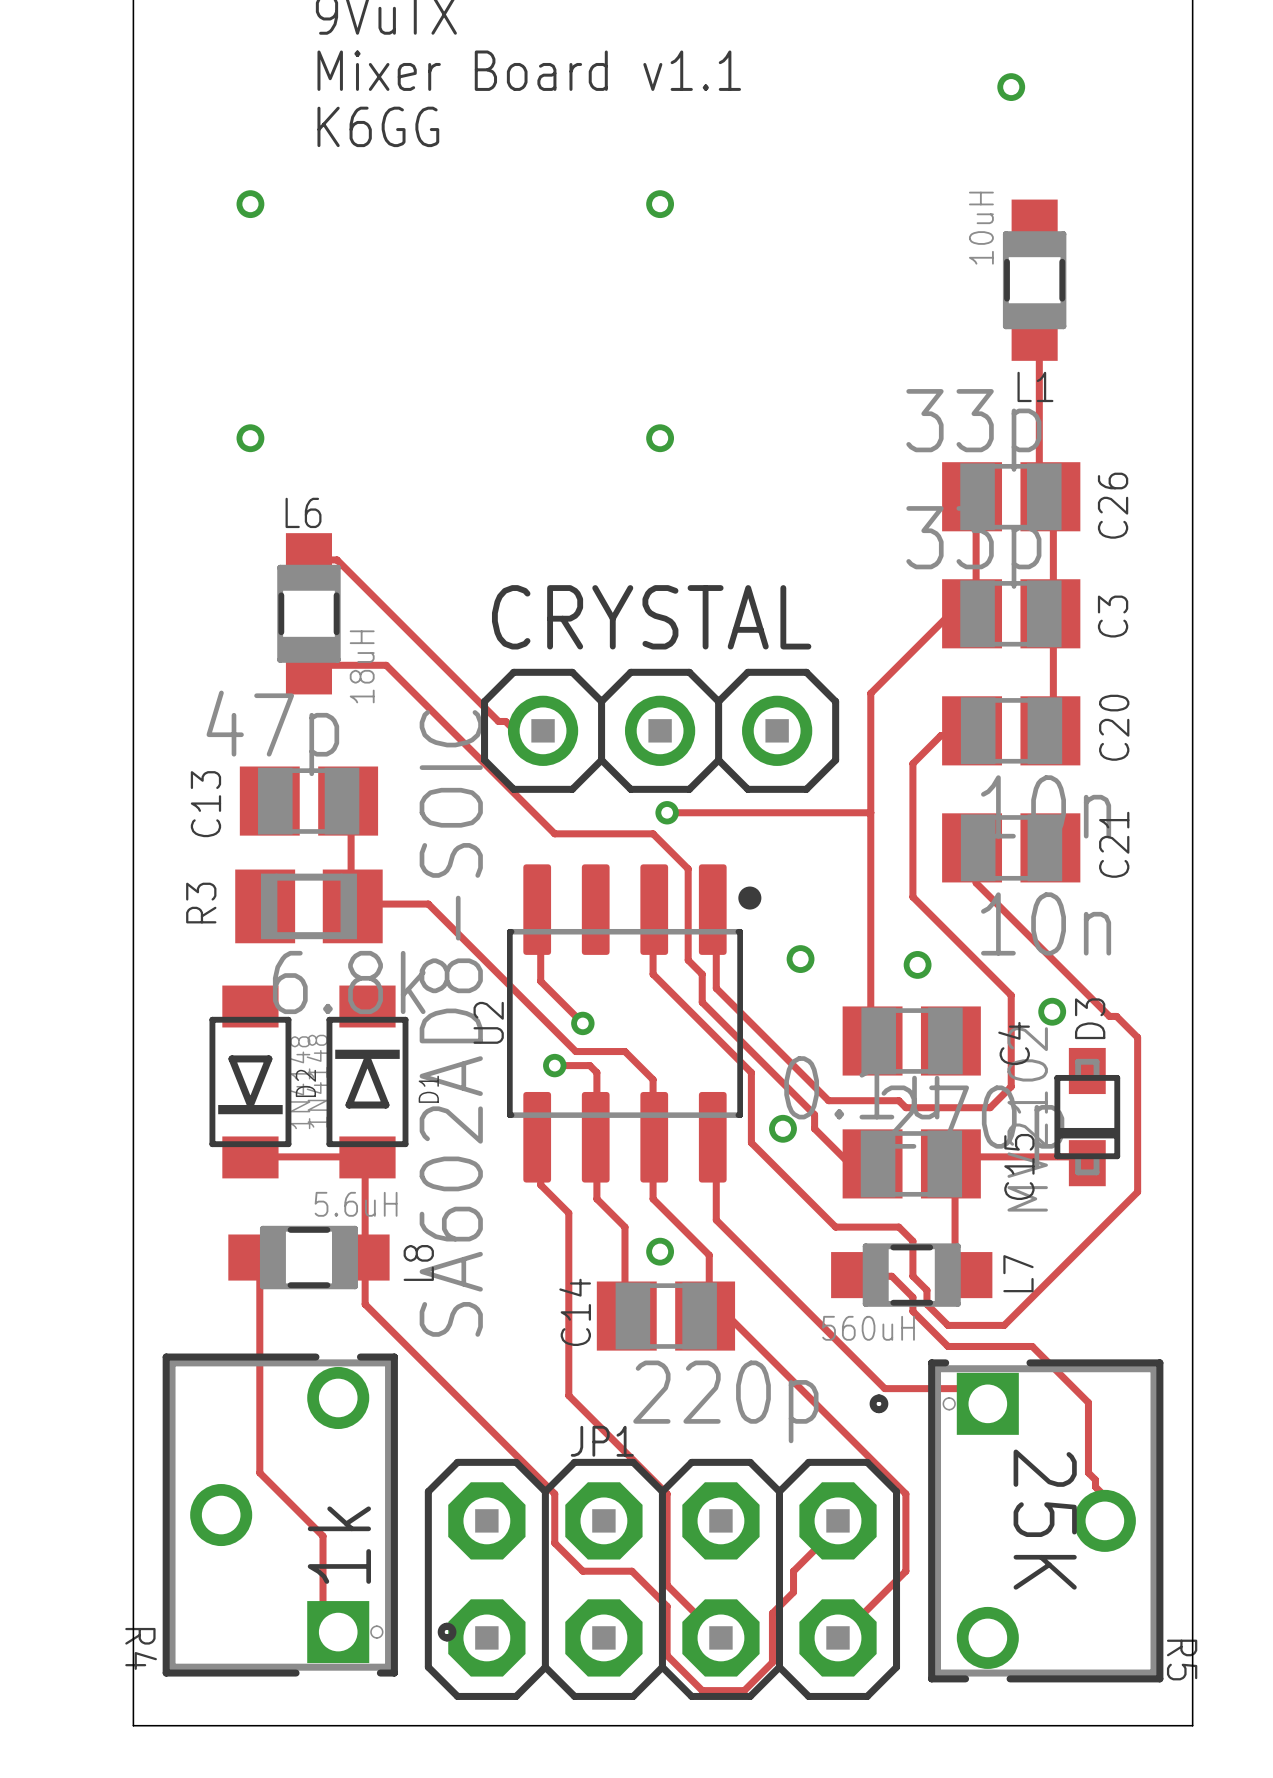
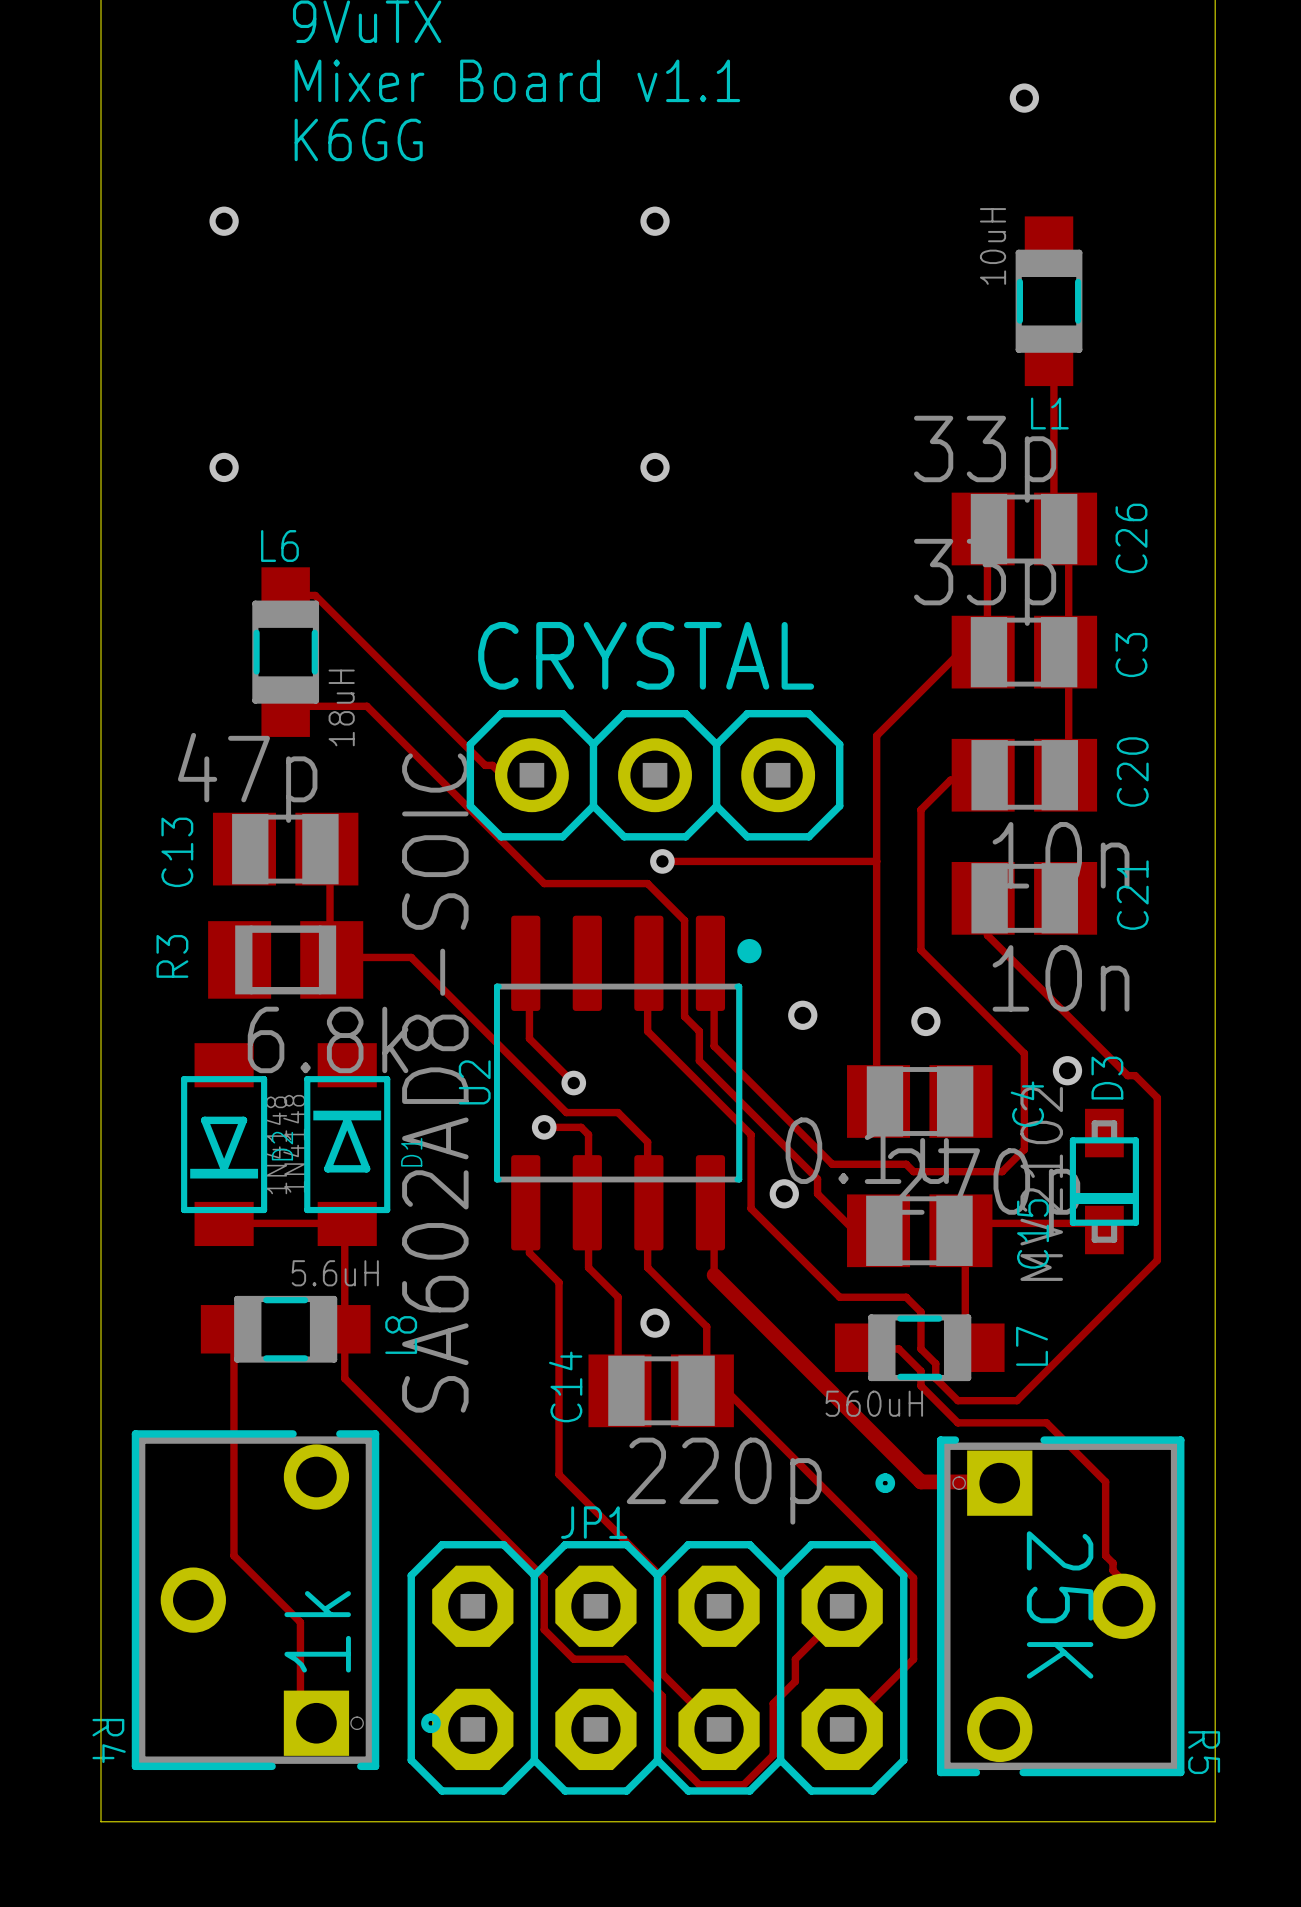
track: (716, 1206) (716, 1220) (884, 1388) (969, 1388) (983, 1402) (987, 1403) -> (714, 1275) (920, 1481) (999, 1483)

